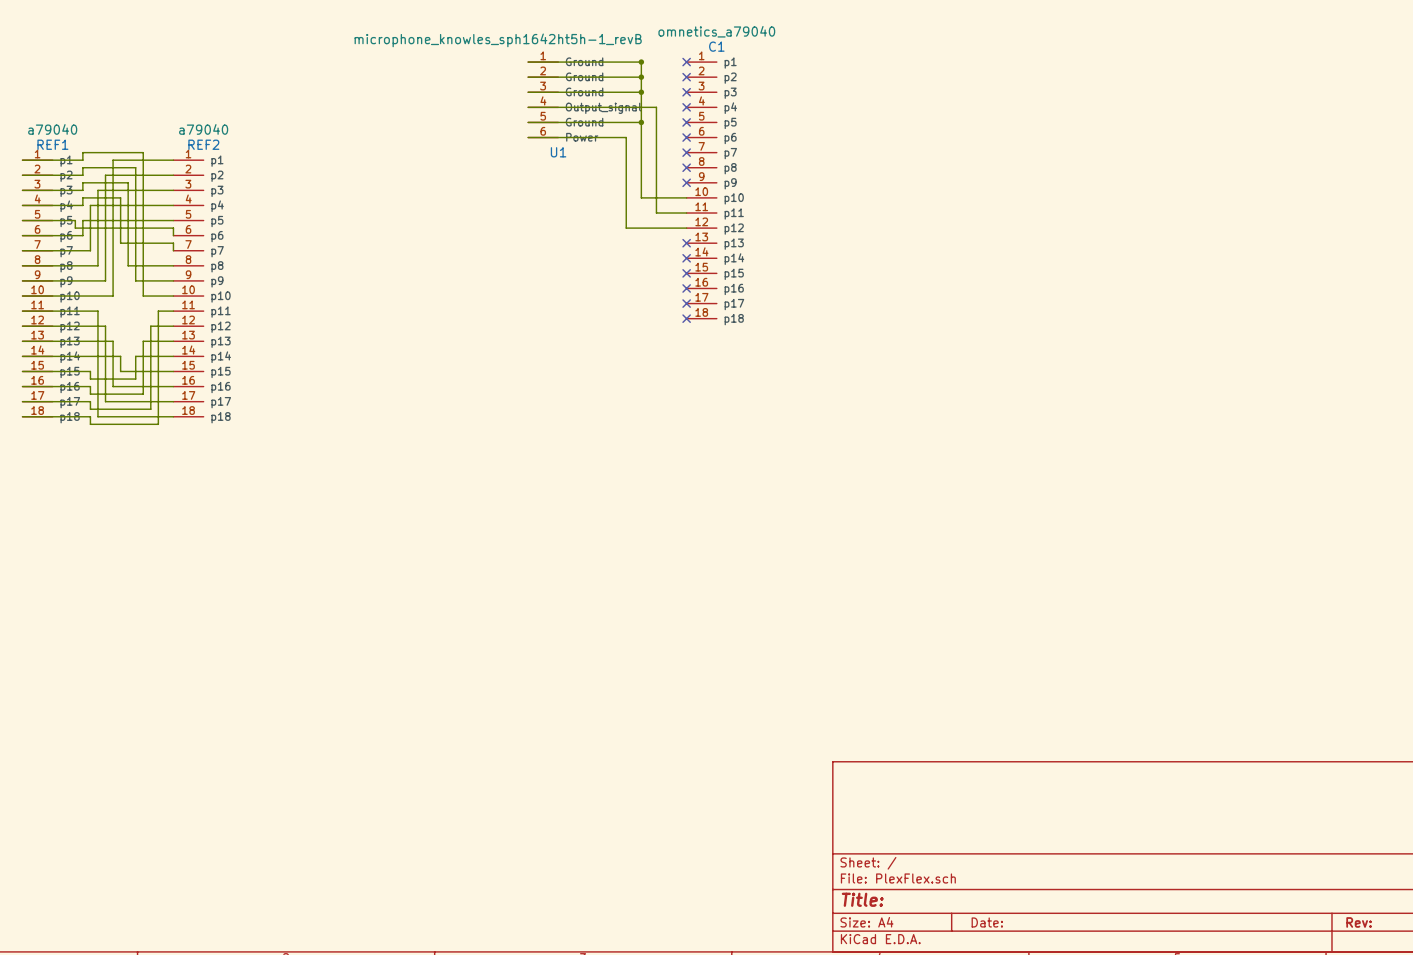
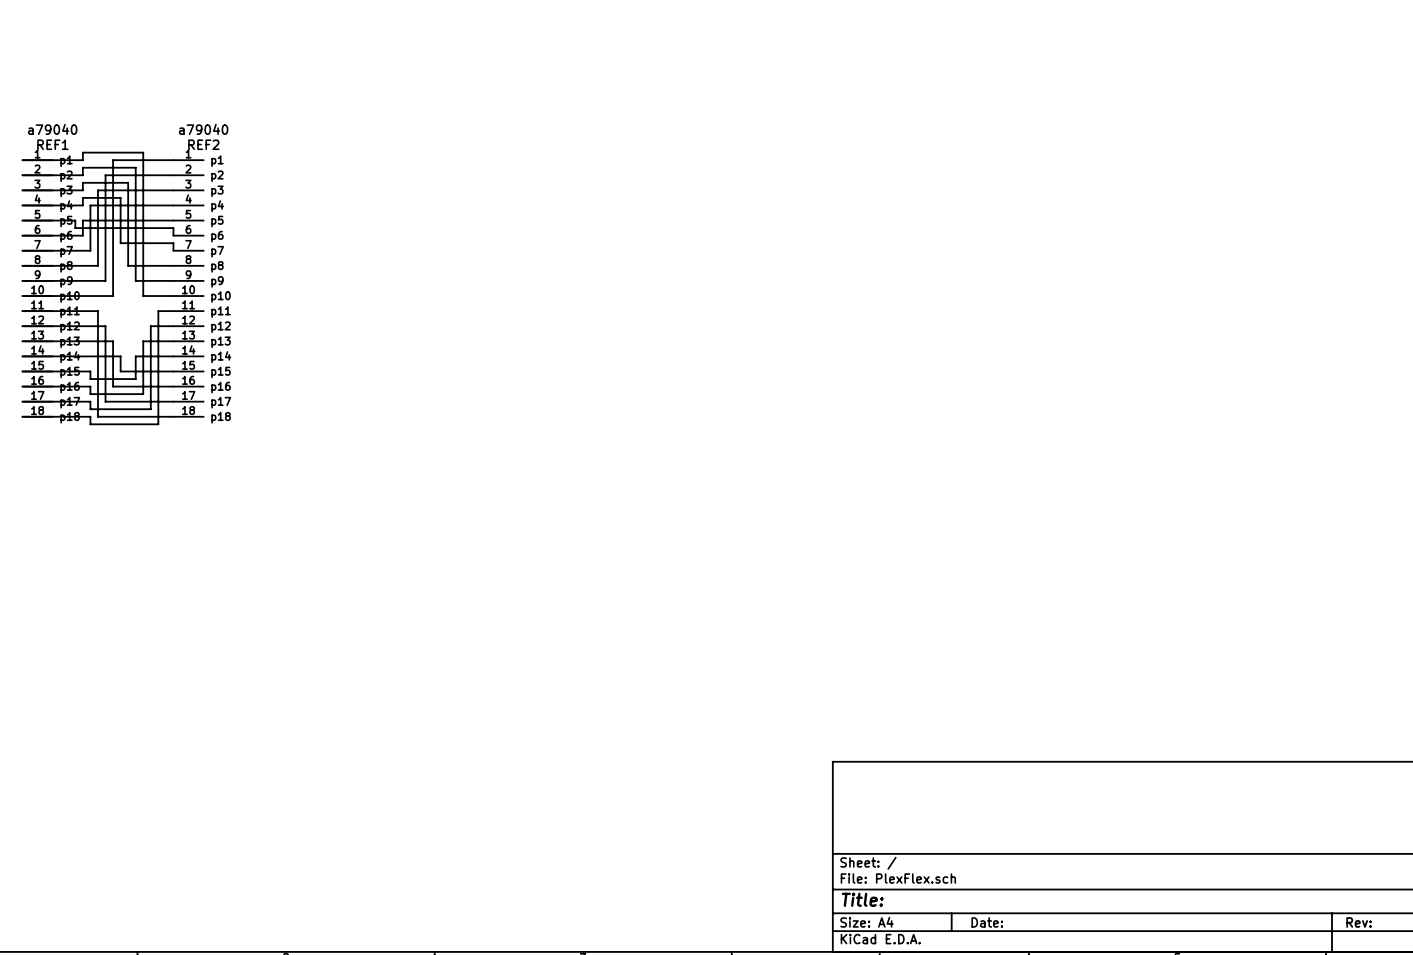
wire: (528, 62) (641, 62) (641, 197) (686, 197) -> none
junction: (641, 62) -> none
no-connect mark: (686, 62) -> none
wire: (528, 77) (641, 77) -> none
junction: (641, 77) -> none
no-connect mark: (686, 77) -> none
wire: (528, 92) (641, 92) -> none
junction: (641, 92) -> none
no-connect mark: (686, 92) -> none
U1: microphone_knowles_sph1642ht5h-1_revB (543, 99) -> none
wire: (528, 107) (656, 107) (656, 213) (686, 213) -> none
no-connect mark: (686, 107) -> none
wire: (528, 122) (641, 122) -> none
junction: (641, 122) -> none
no-connect mark: (686, 122) -> none
wire: (528, 137) (626, 137) (626, 228) (686, 228) -> none
no-connect mark: (686, 137) -> none
no-connect mark: (686, 152) -> none
no-connect mark: (686, 167) -> none
no-connect mark: (686, 182) -> none
C1: omnetics_a79040 (701, 190) -> none
no-connect mark: (686, 243) -> none
no-connect mark: (686, 258) -> none
no-connect mark: (686, 273) -> none
no-connect mark: (686, 288) -> none
no-connect mark: (686, 303) -> none
no-connect mark: (686, 318) -> none

